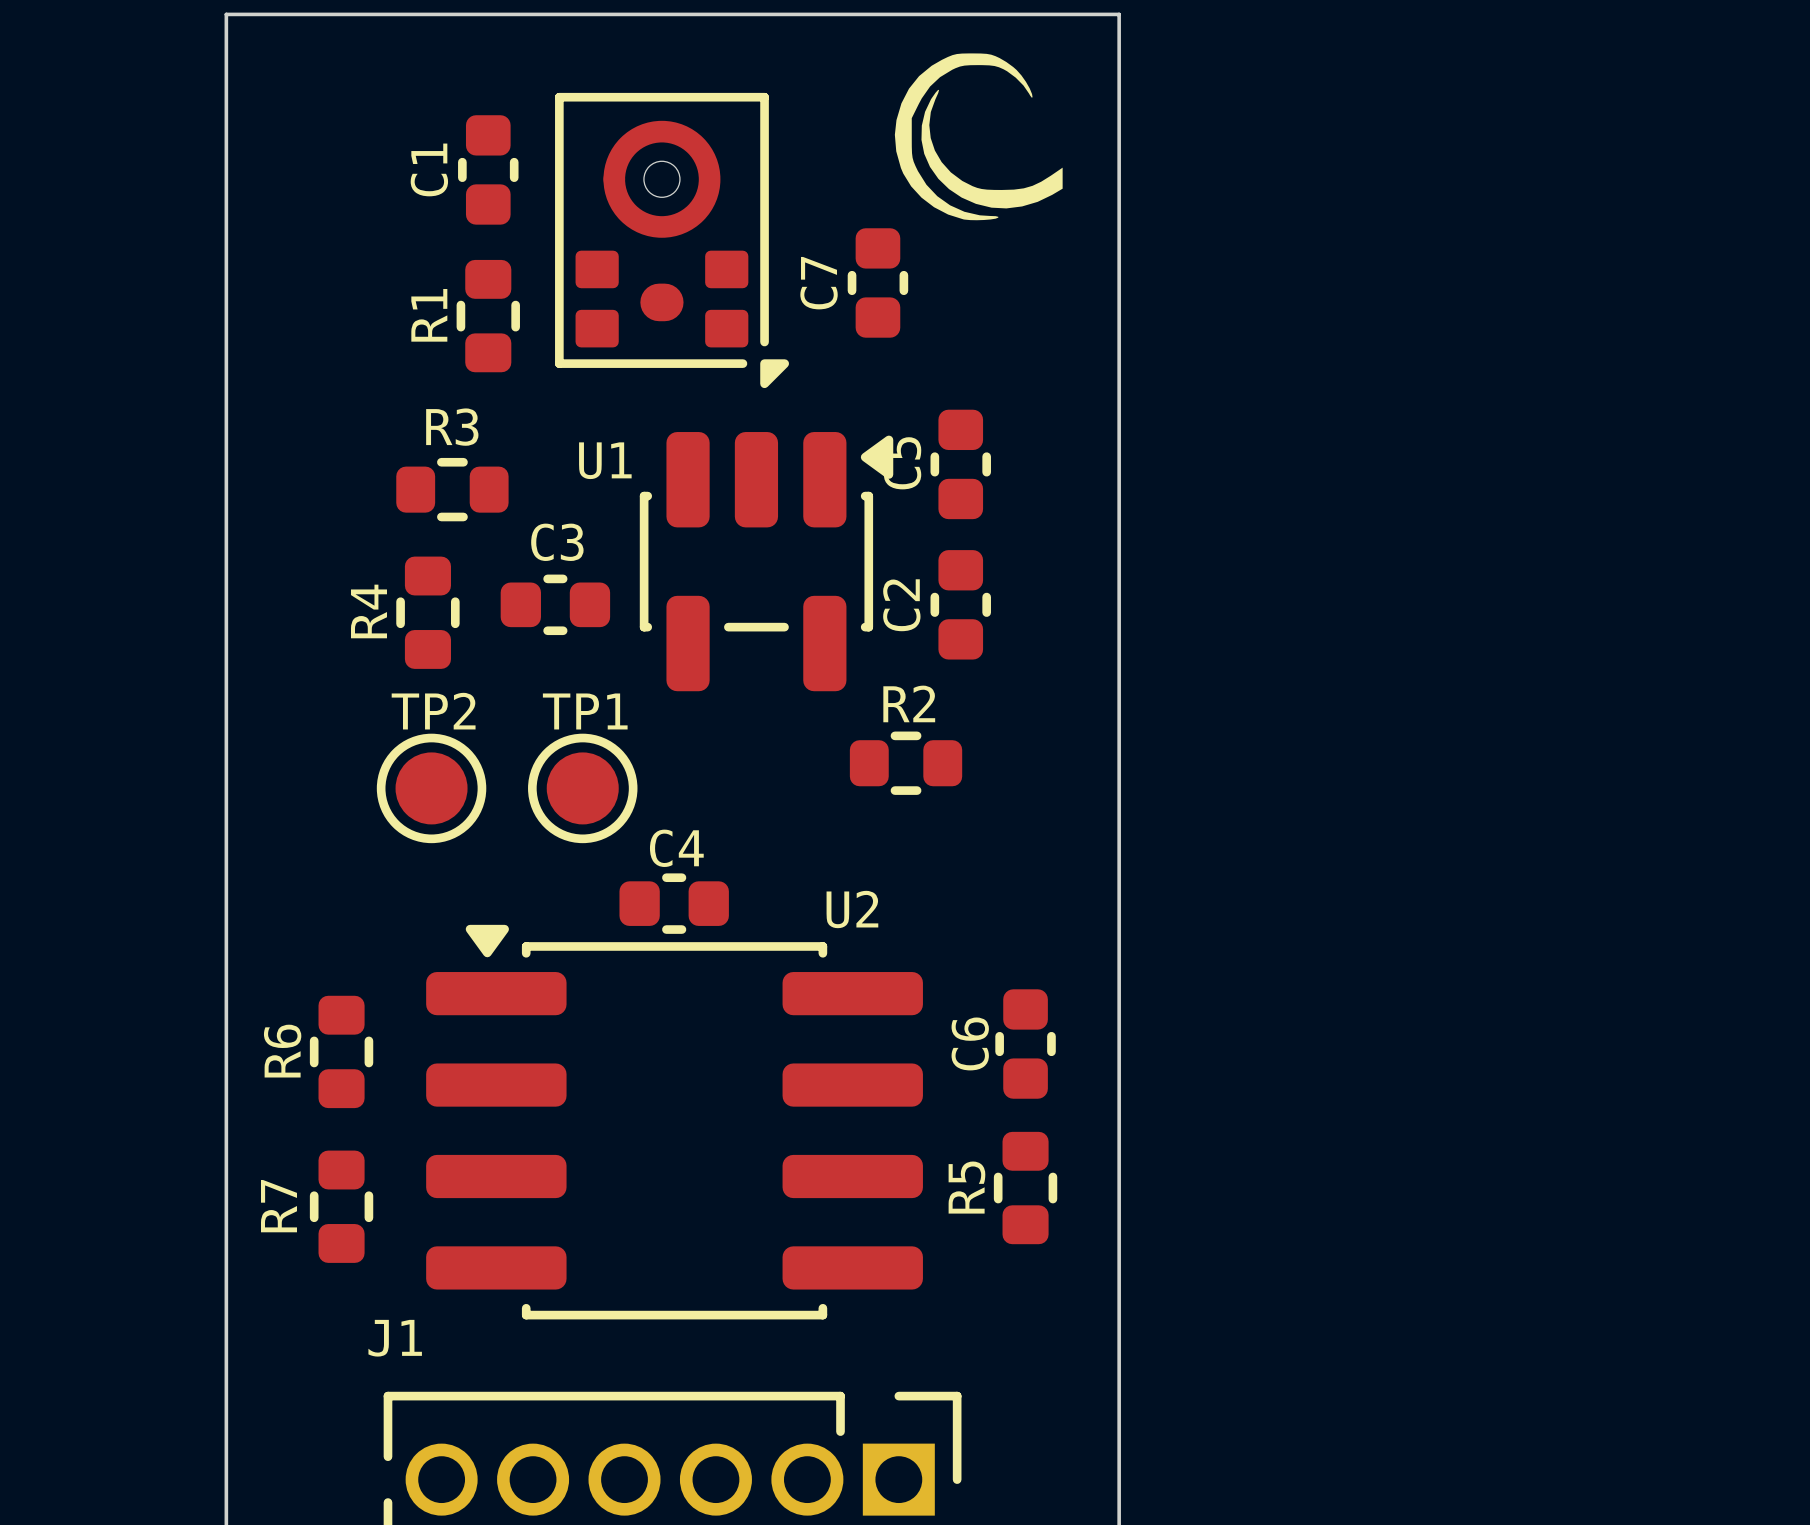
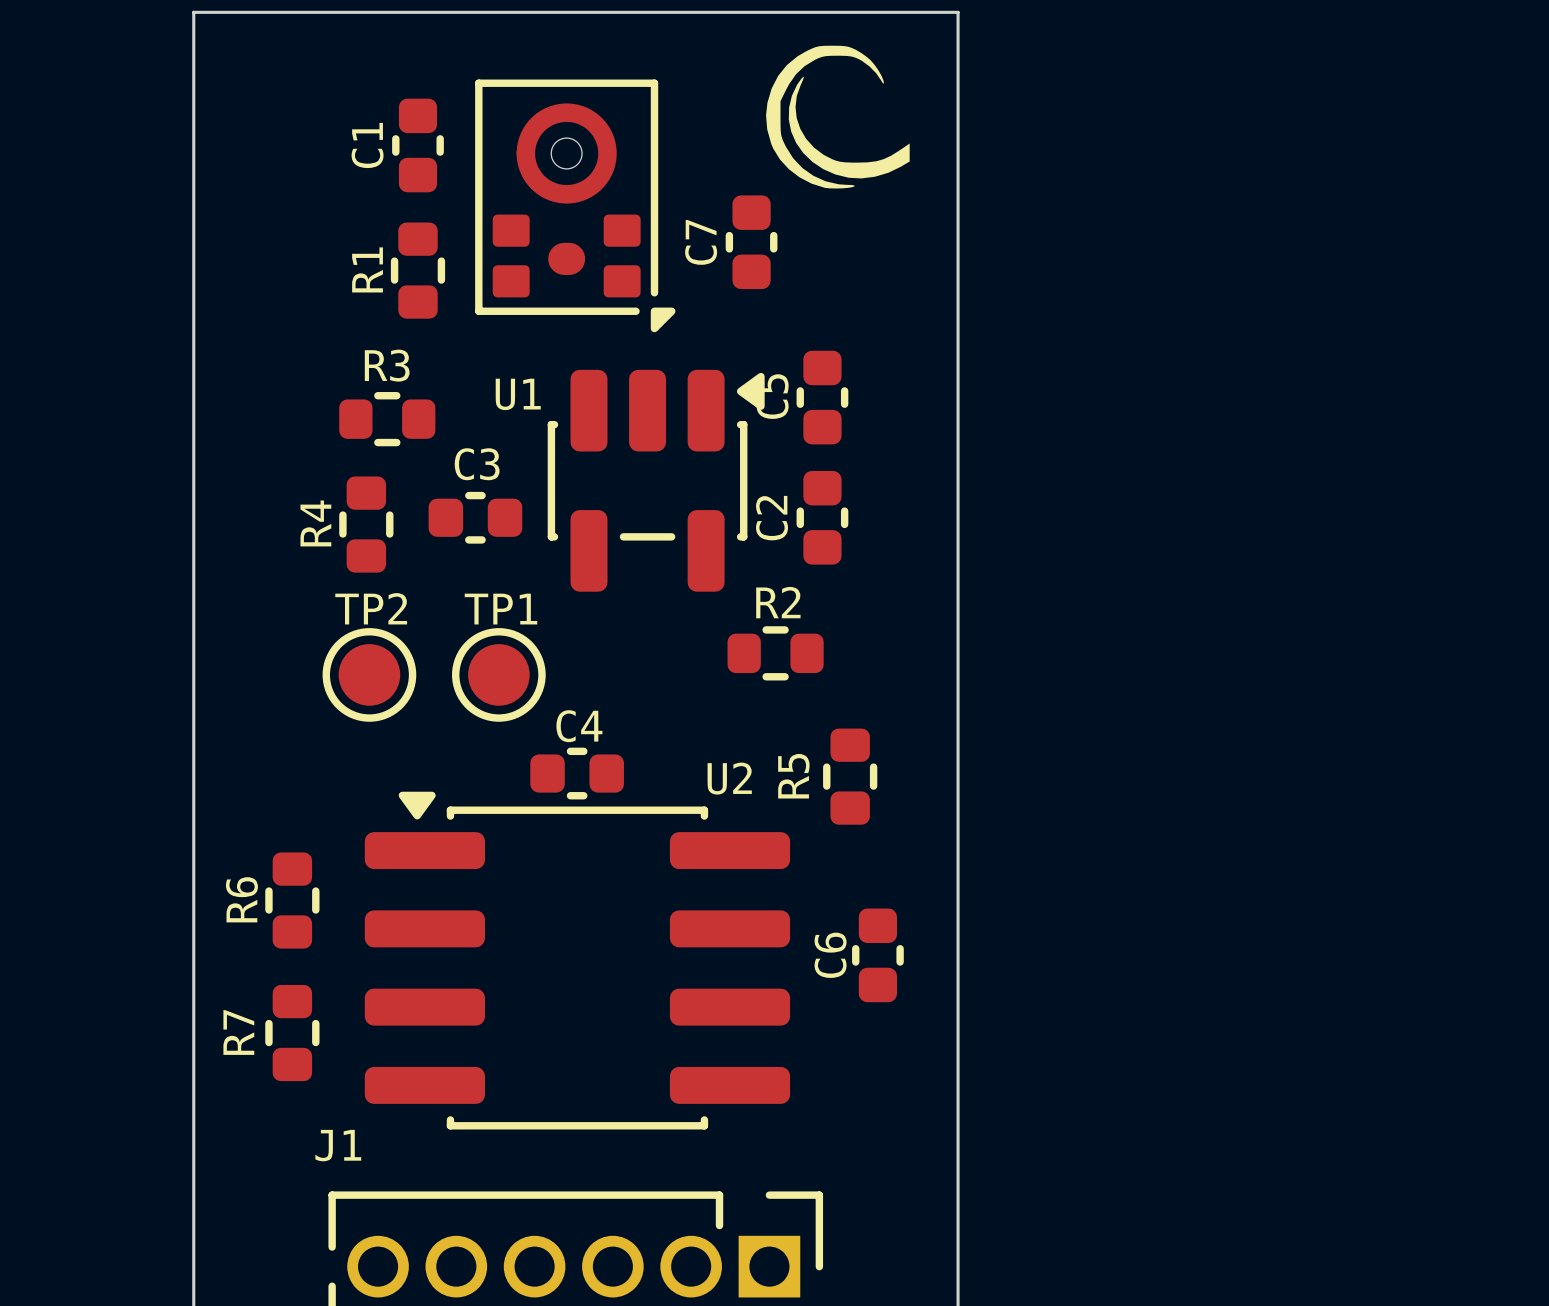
C6 position: (1025, 1044) -> (877, 955)
R5 name position: R5 (966, 1187) -> R5 (793, 776)
R5 position: (1025, 1188) -> (850, 776)

